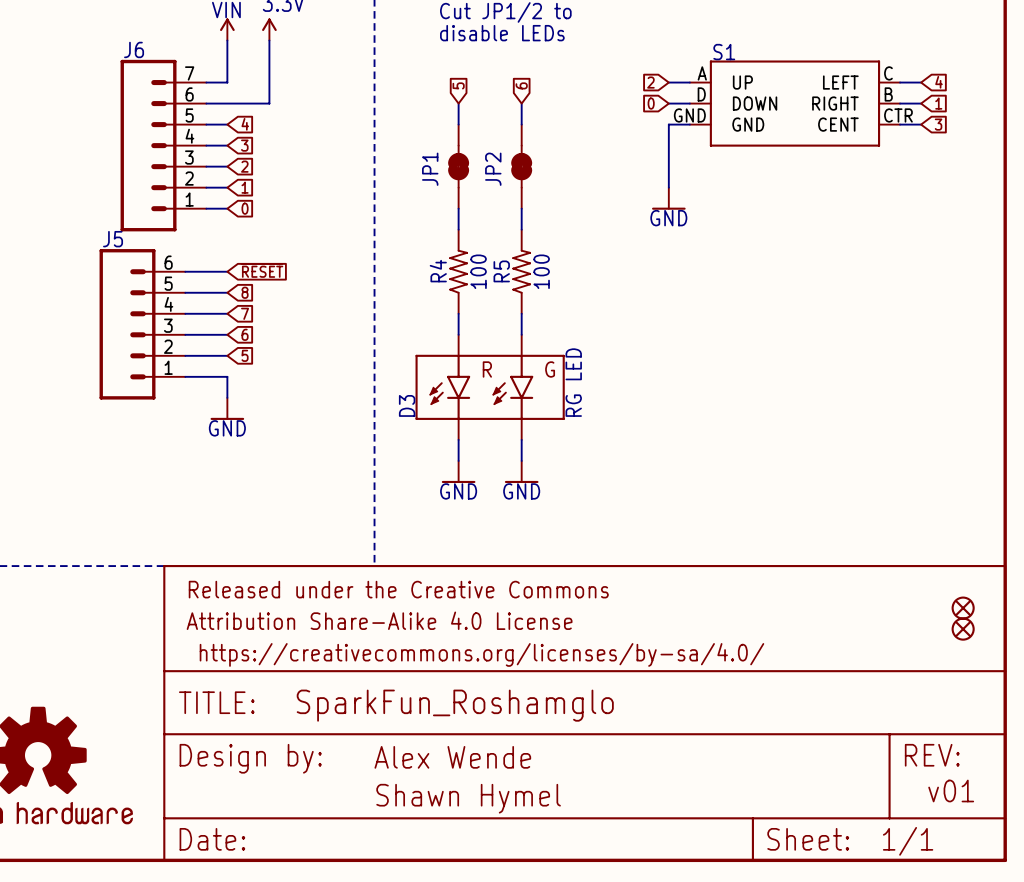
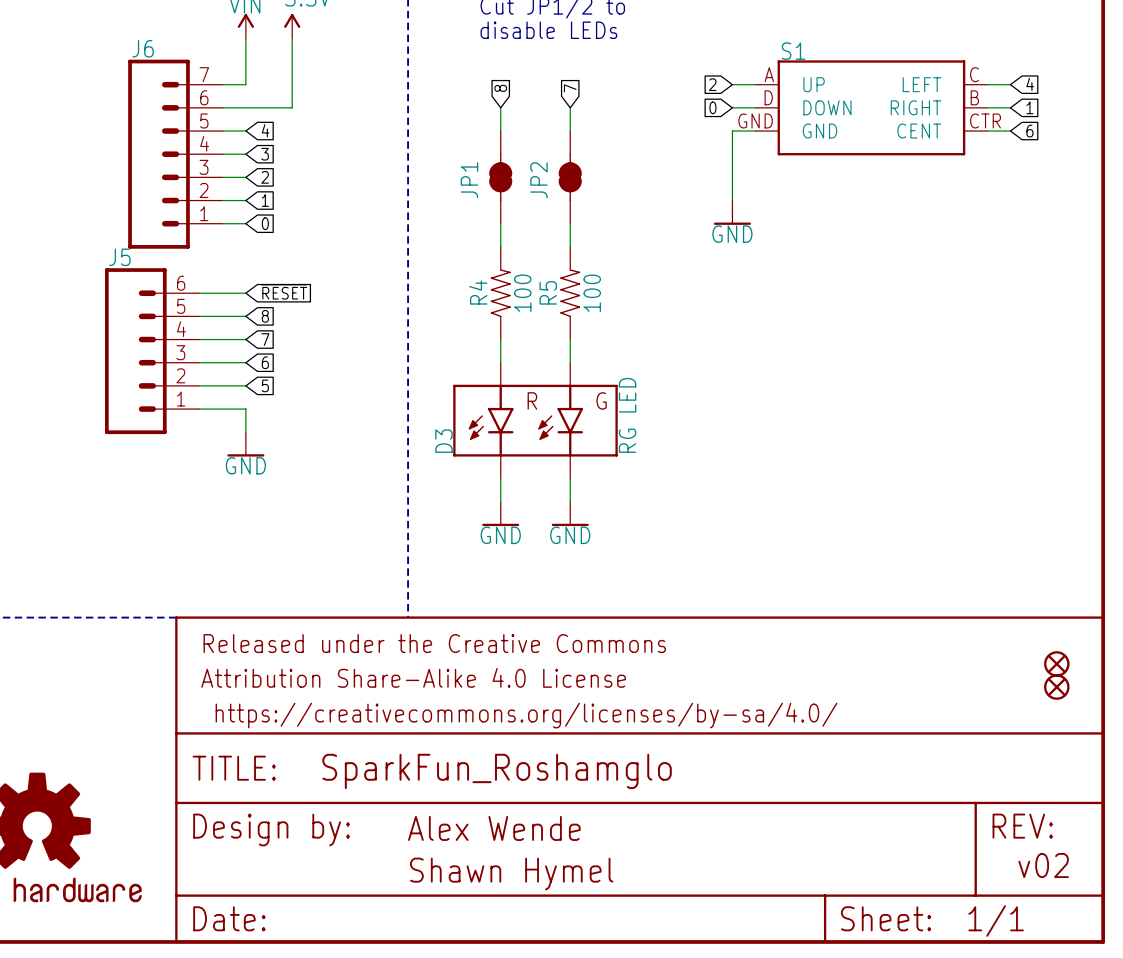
global label: 5 (458, 85) -> 8 (500, 88)
global label: 6 (521, 85) -> 7 (570, 88)
global label: 3 (938, 124) -> 6 (1029, 131)
text: v01 (951, 790) -> v02 (1043, 865)

